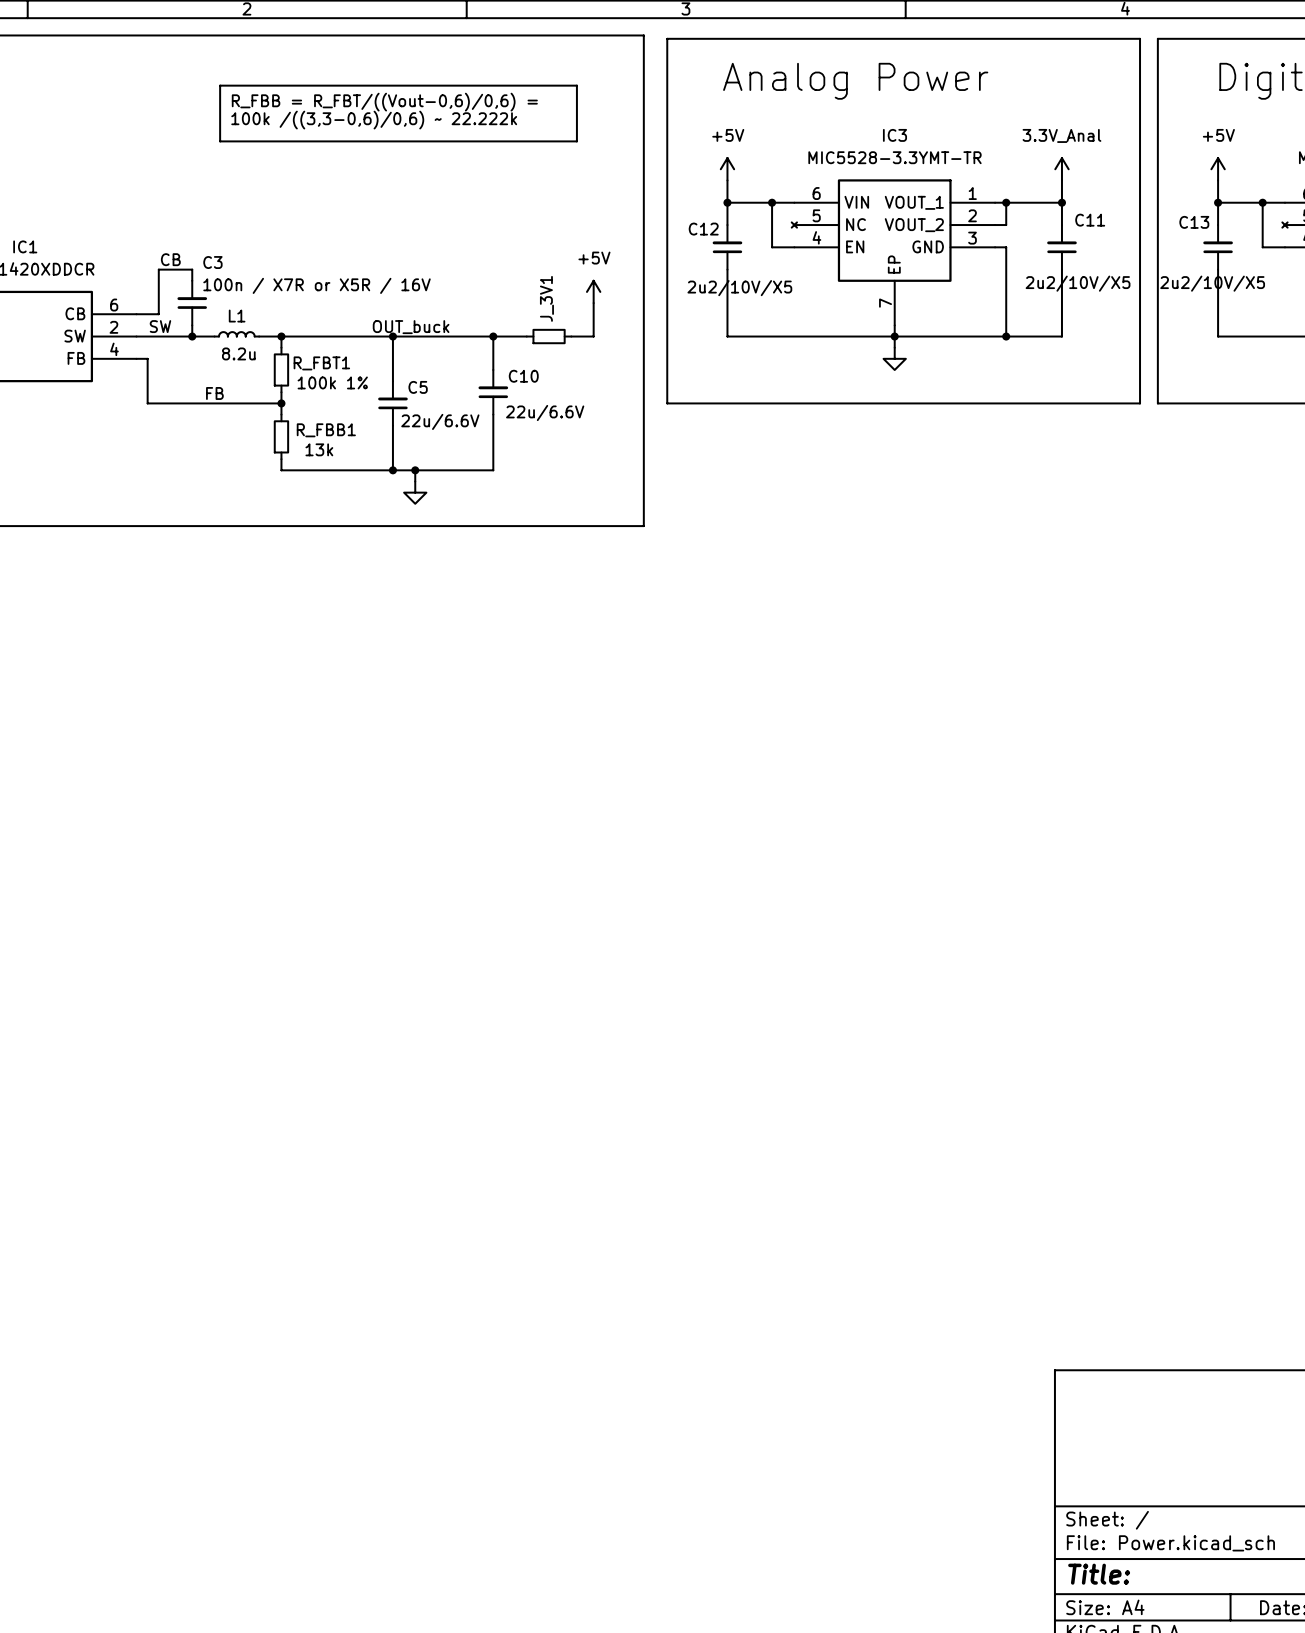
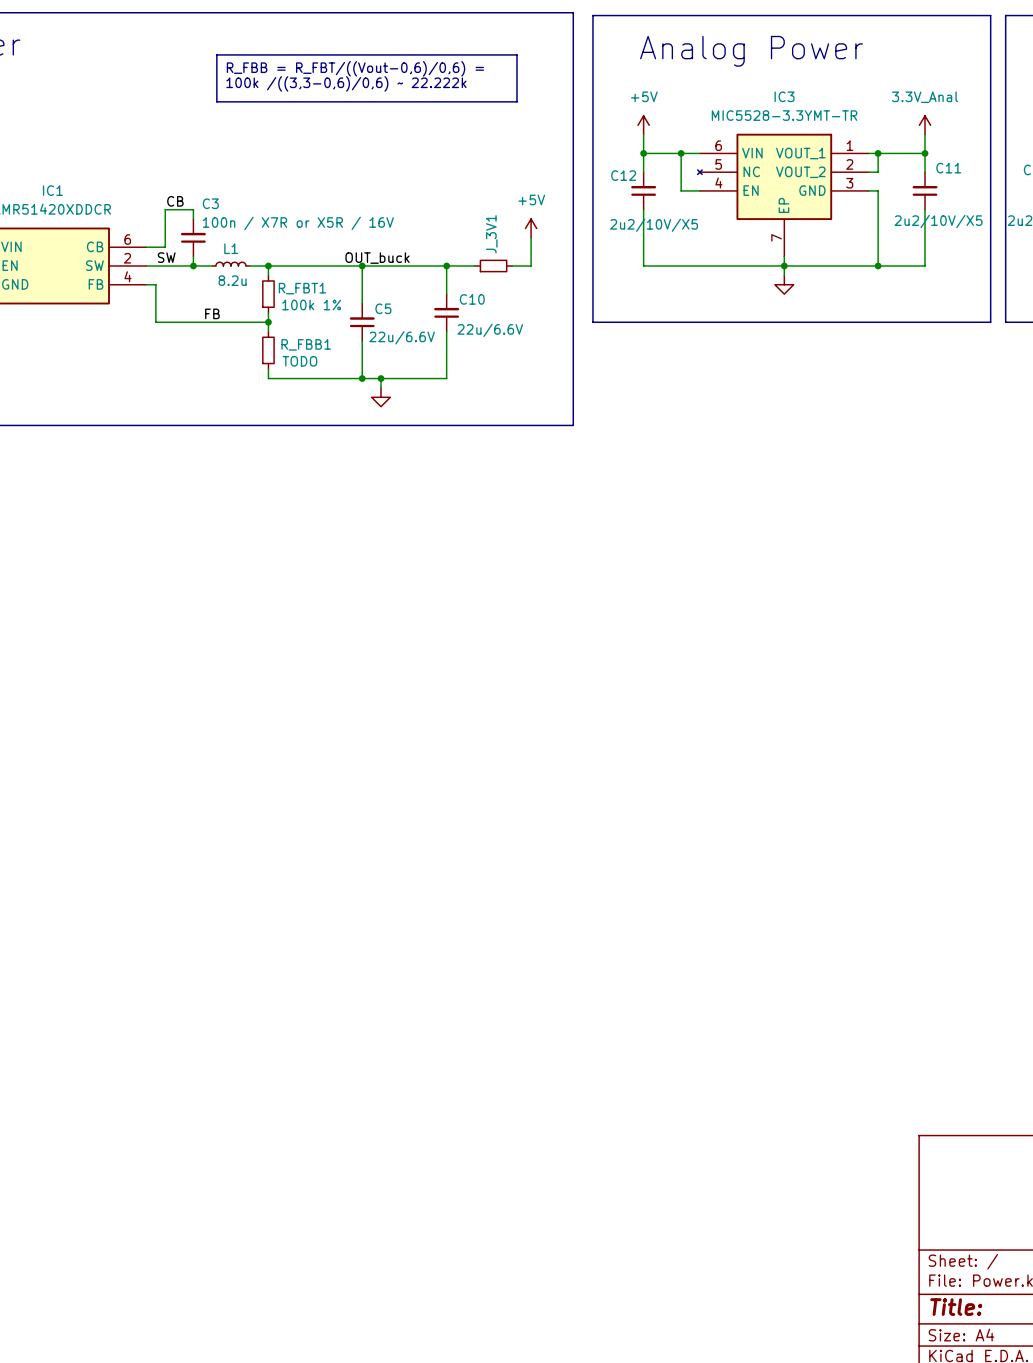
R_FBB1 value: 13k (319, 449) -> TODO (299, 361)

